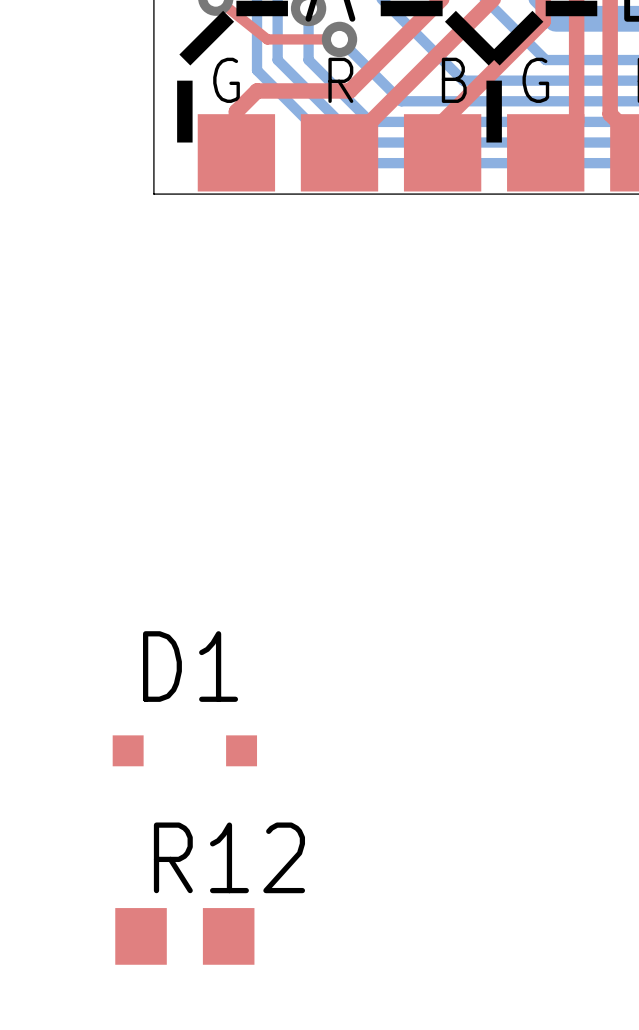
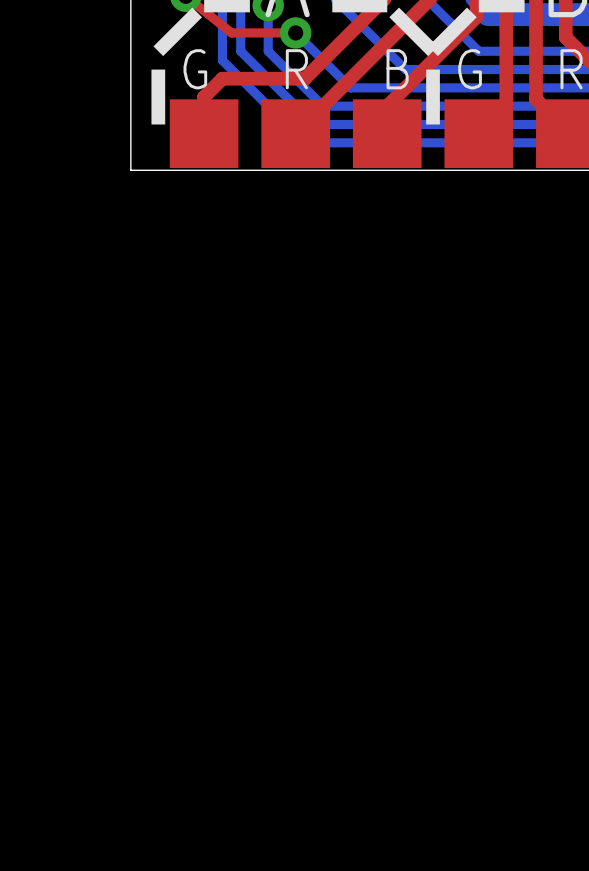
D1: (184, 750) -> none
R12: (184, 936) -> none

